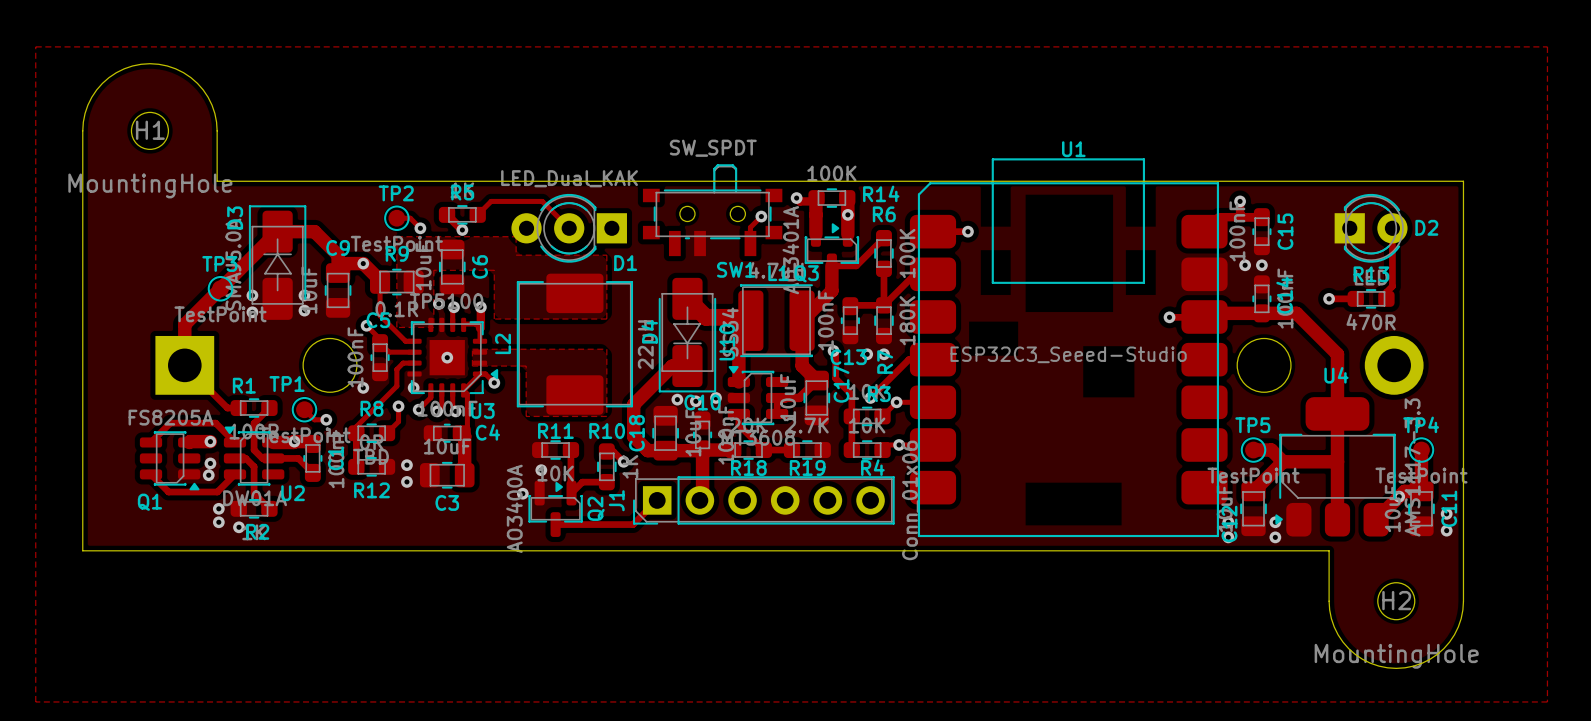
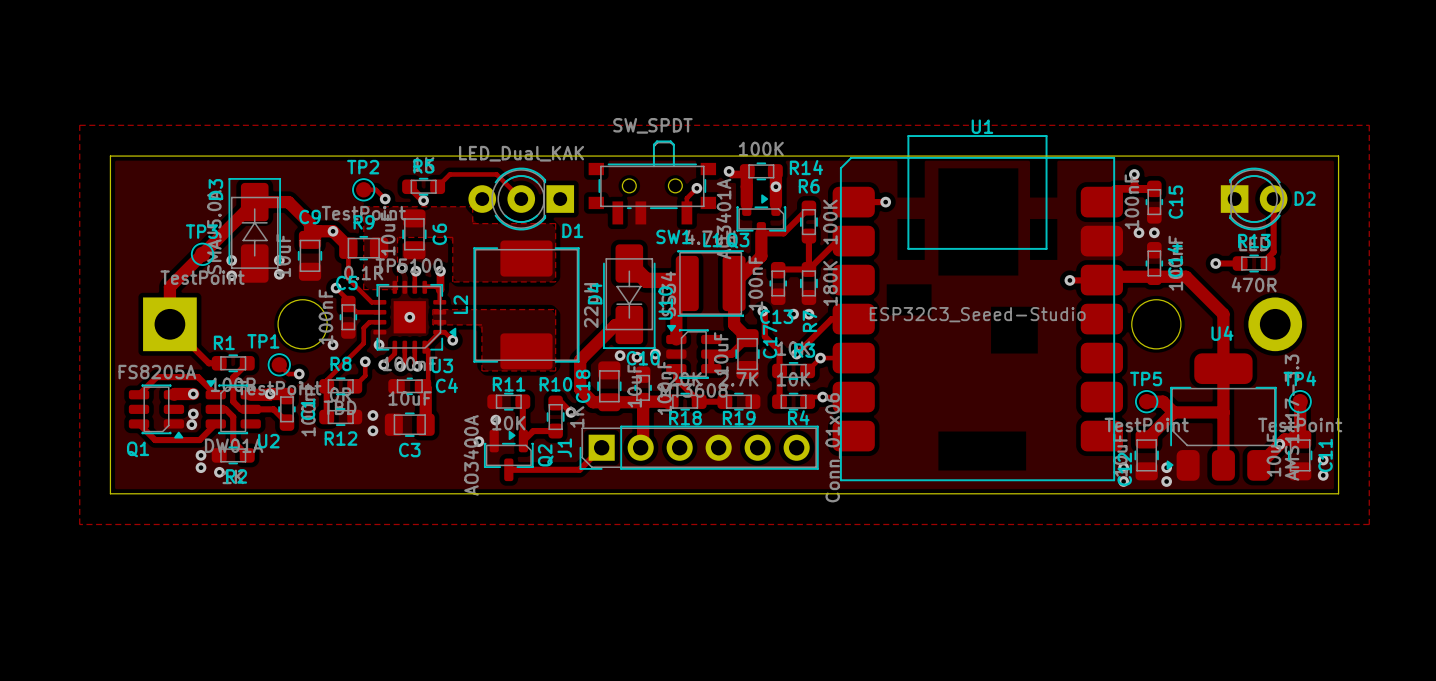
zone outline: (35, 46) (1547, 46) (1547, 701) (35, 701) (35, 46) -> (79, 125) (79, 524) (1369, 524) (1369, 125) (79, 125)
H1: MountingHole (149, 130) -> none
board edge: (217, 181) (217, 130) (214, 113) (208, 97) (190, 77) (167, 65) (141, 64) (116, 72) (96, 89) (87, 105) (82, 130) (82, 550) (119, 550) -> (199, 156) (110, 156) (110, 493)
board edge: (1329, 550) (1329, 609) (1338, 634) (1348, 648) (1362, 659) (1378, 666) (1396, 668) (1413, 666) (1429, 659) (1443, 648) (1454, 634) (1462, 609) (1463, 550) -> (1215, 493) (1338, 493)
H2: MountingHole (1396, 601) -> none

